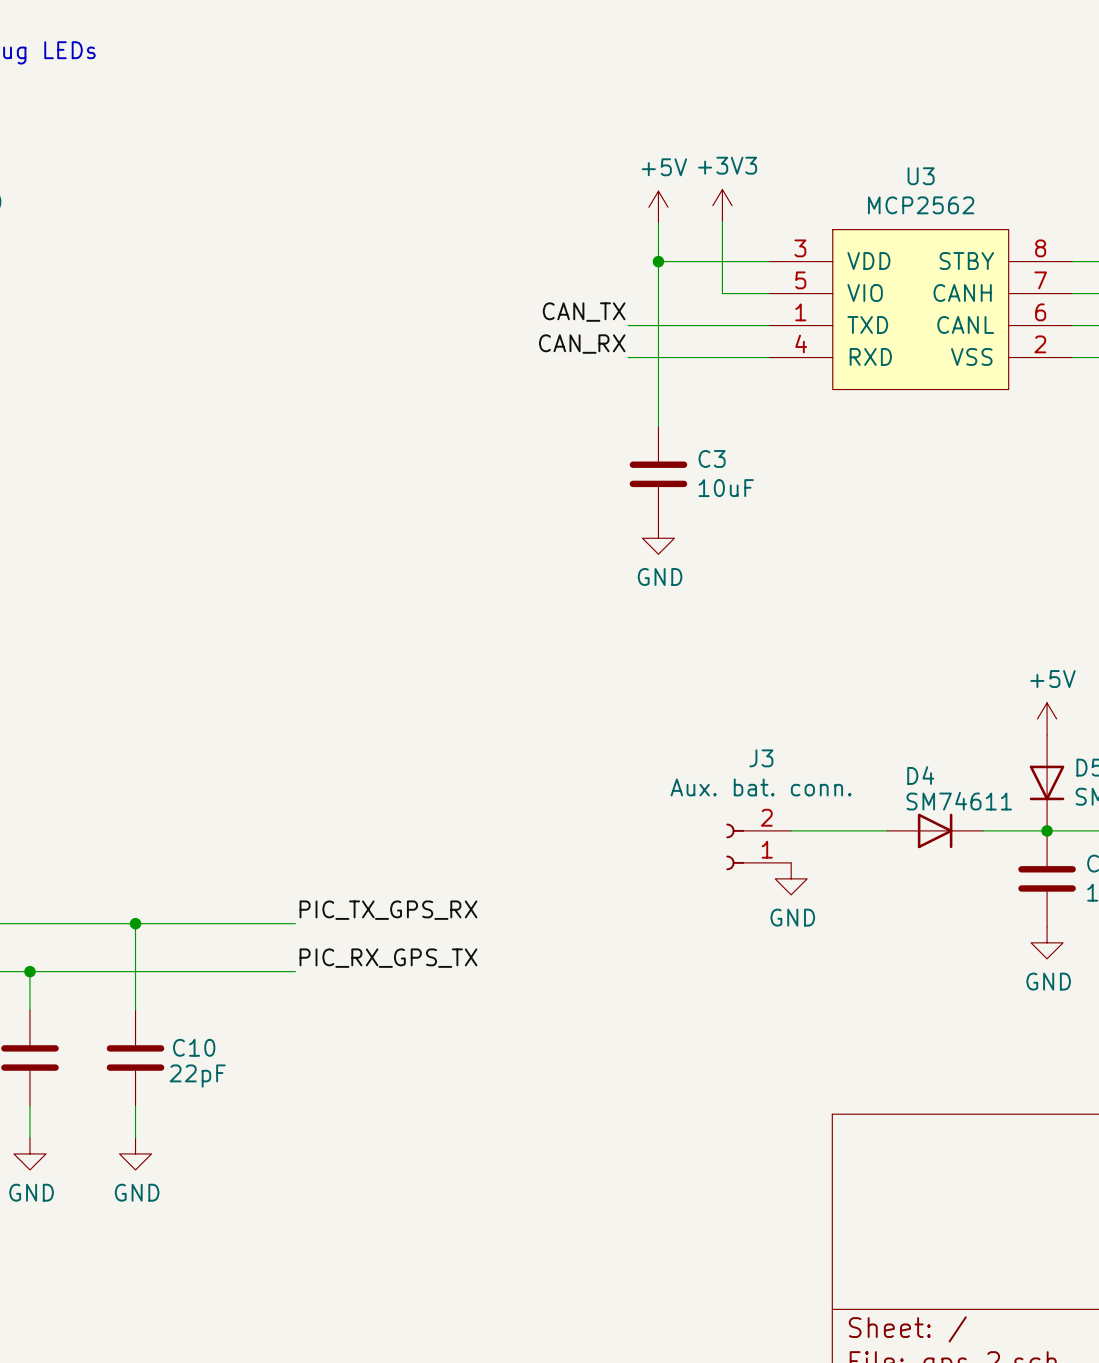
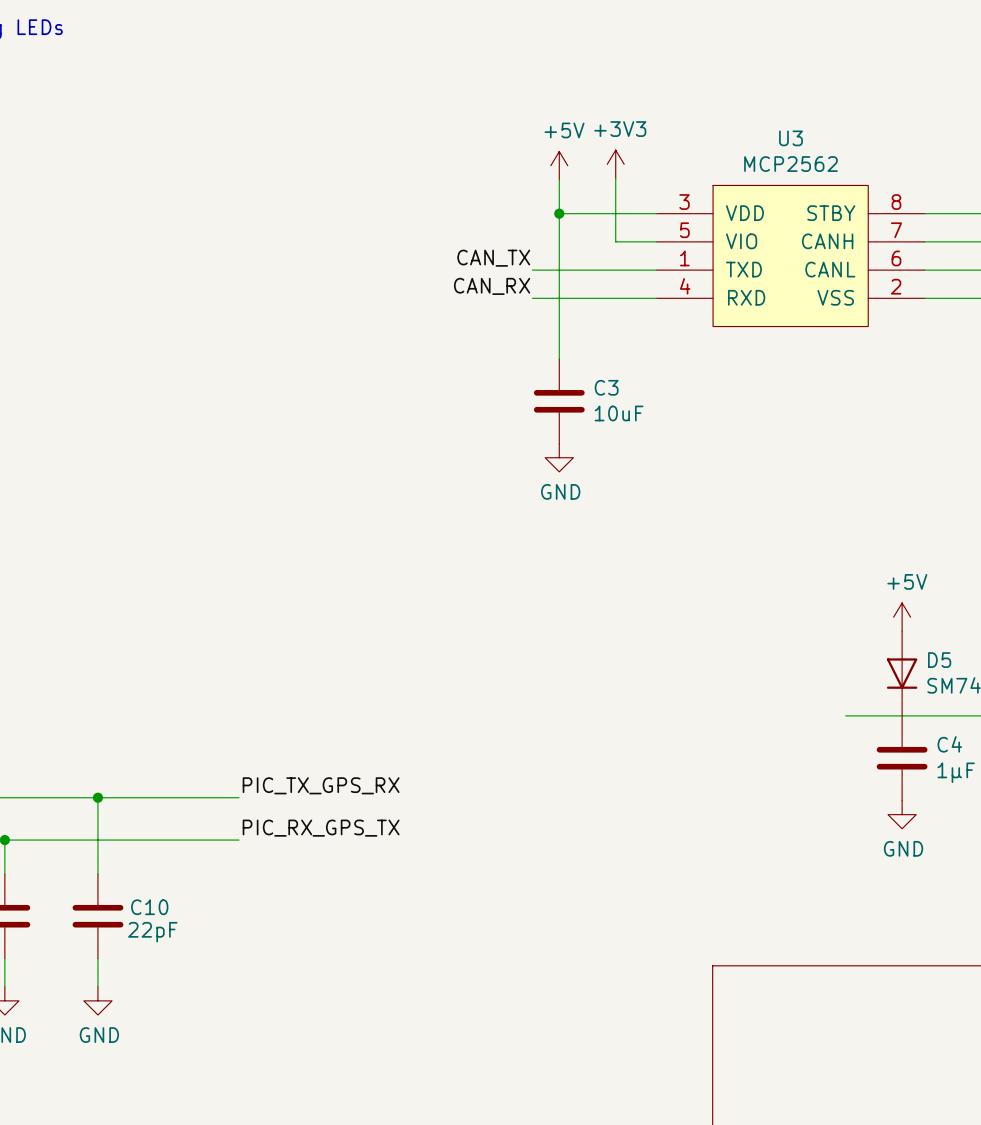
wire: (791, 830) (887, 830) -> none
D4: SM74611 (935, 830) -> none
junction: (1047, 830) -> none
J3: Aux. bat. conn. (758, 846) -> none
power symbol: GND (791, 878) -> none

